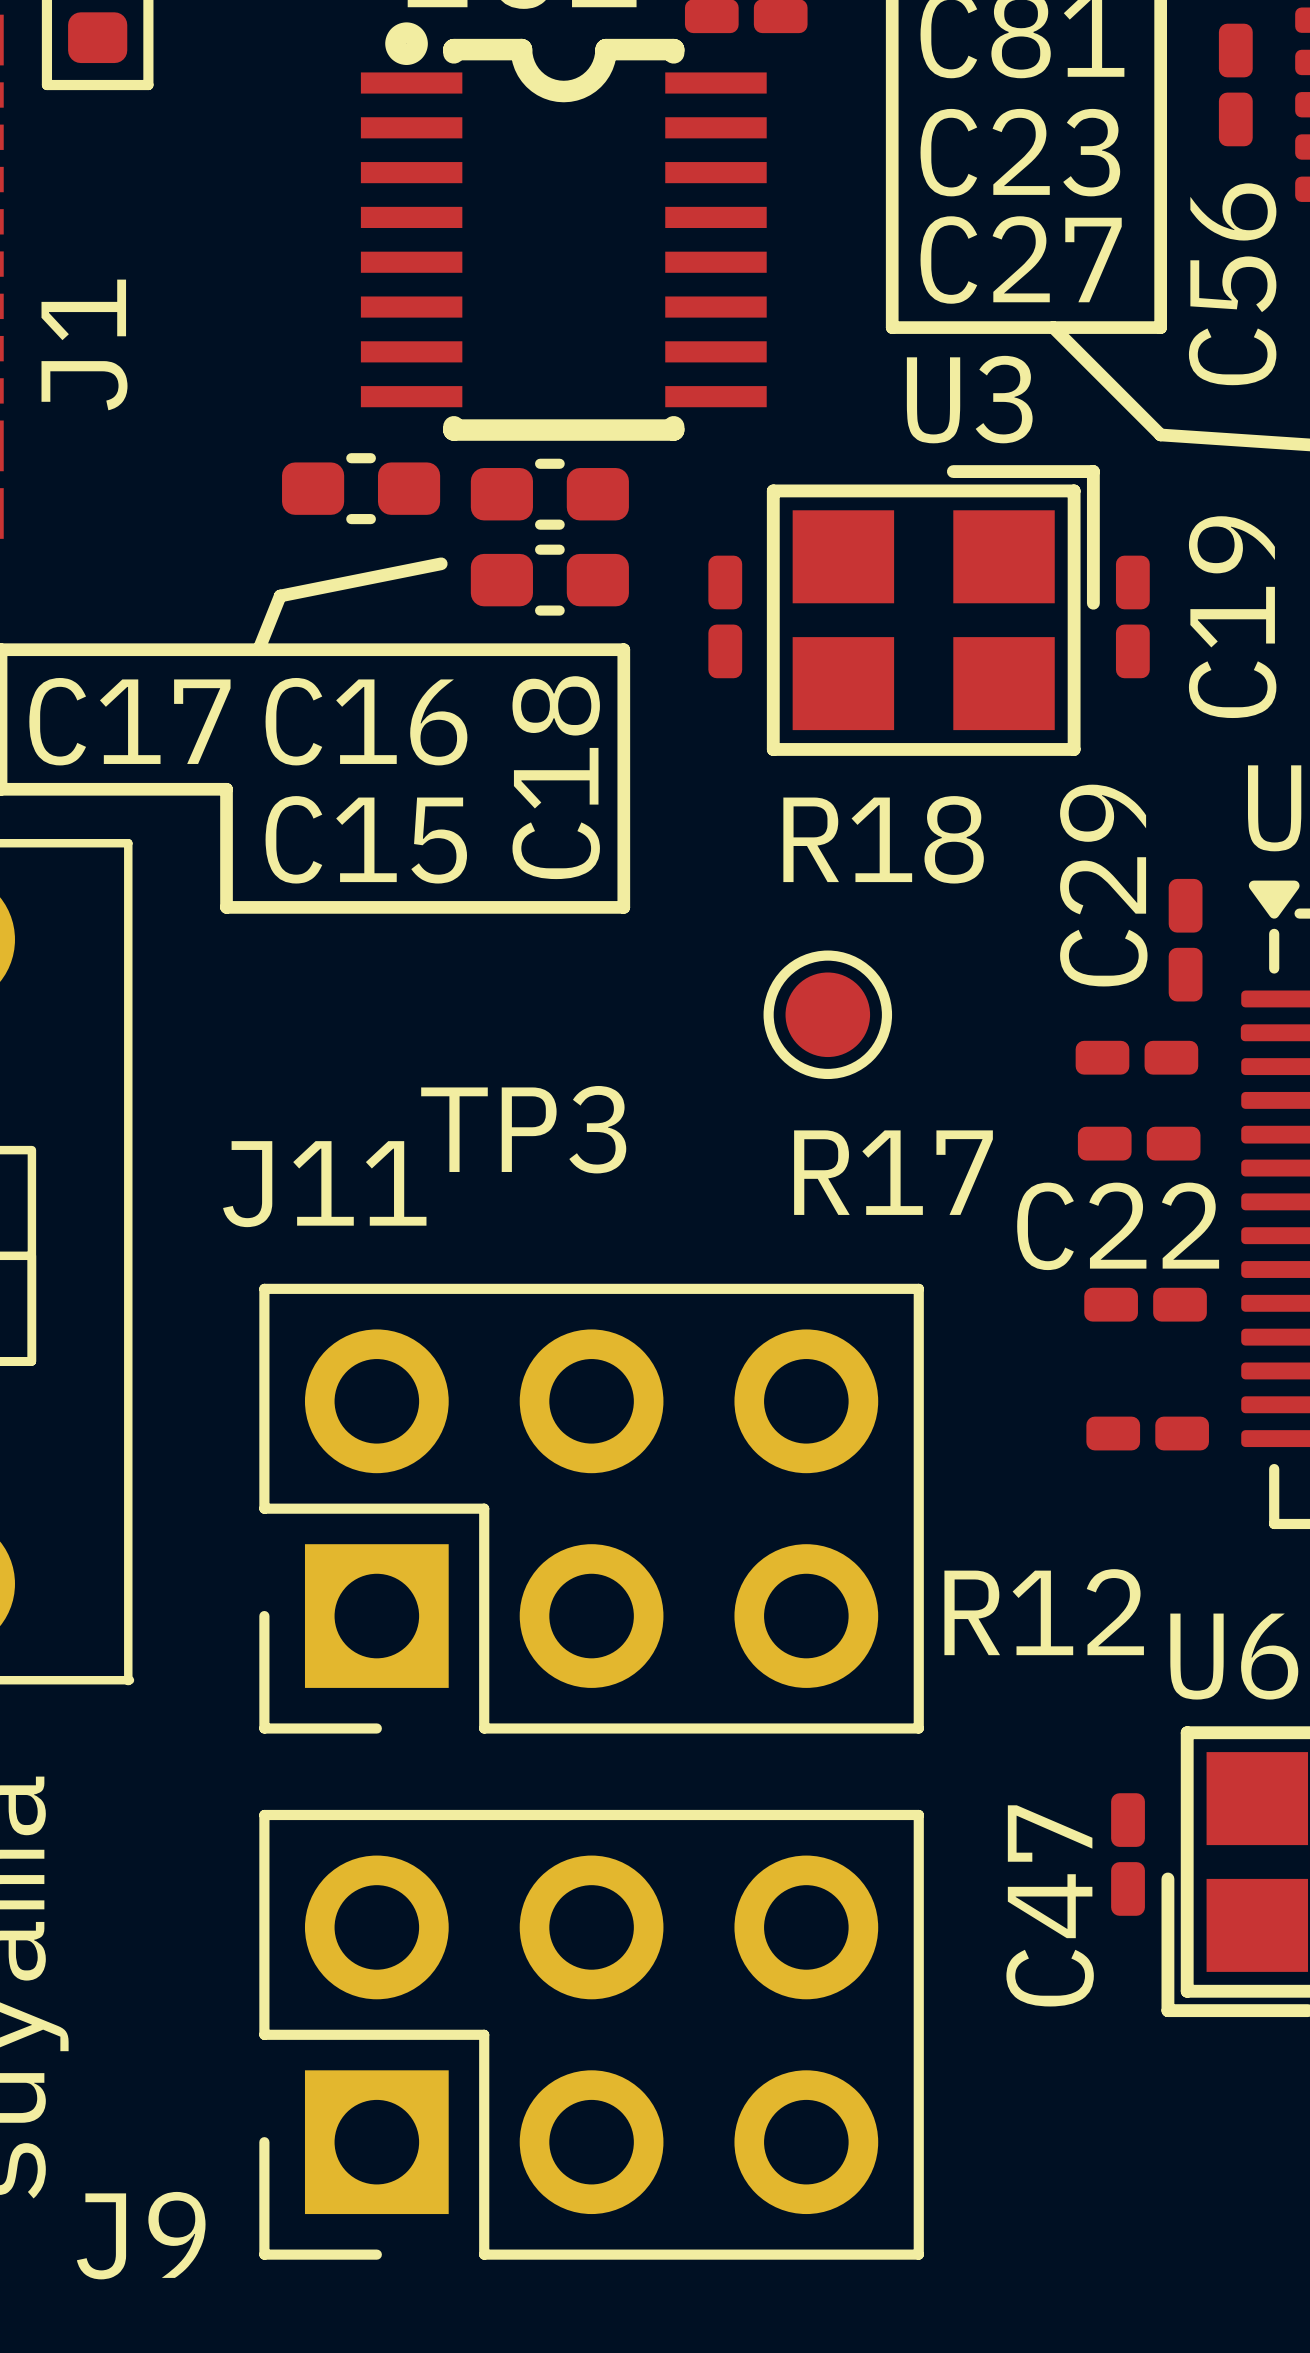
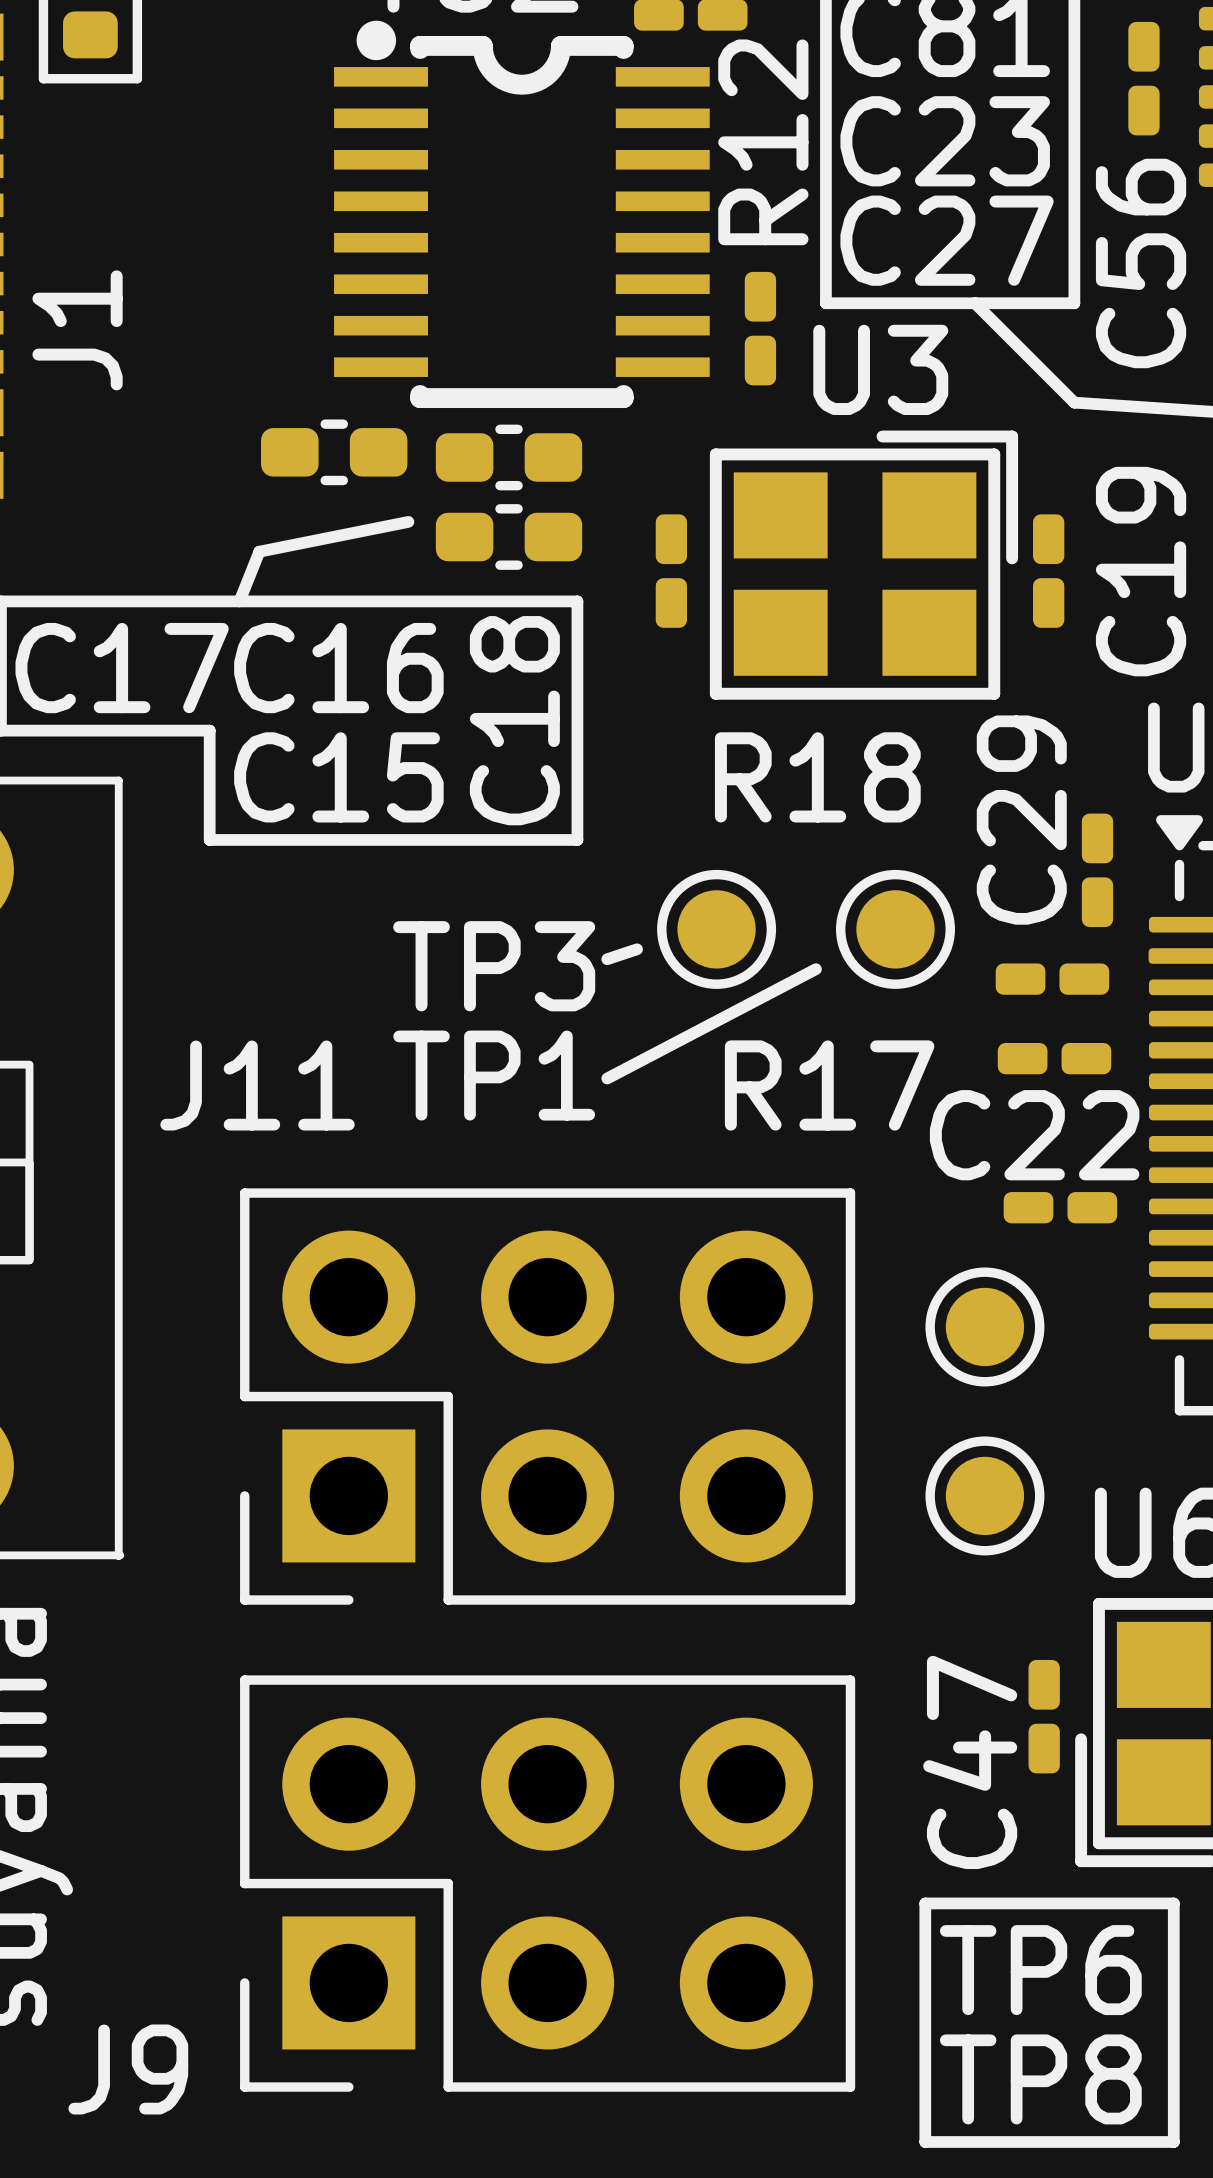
TP1: none -> (895, 929)
TP3 position: (827, 1014) -> (716, 929)
line: none -> (637, 949) (607, 959)
line: none -> (815, 969) (607, 1078)
TP3 name position: TP3 (523, 1129) -> TP3 (494, 966)
J11 name position: J11 (324, 1184) -> J11 (257, 1085)
TP6: none -> (984, 1326)
R12 rotation: 0° (1147, 1433) -> 90° clockwise (760, 328)
R12 position: (1147, 1433) -> (760, 328)
R12 name position: R12 (1044, 1612) -> R12 (763, 142)
TP8: none -> (984, 1495)
line: none -> (925, 1903) (1173, 1903) (1173, 2141) (925, 2141) (925, 1903)

